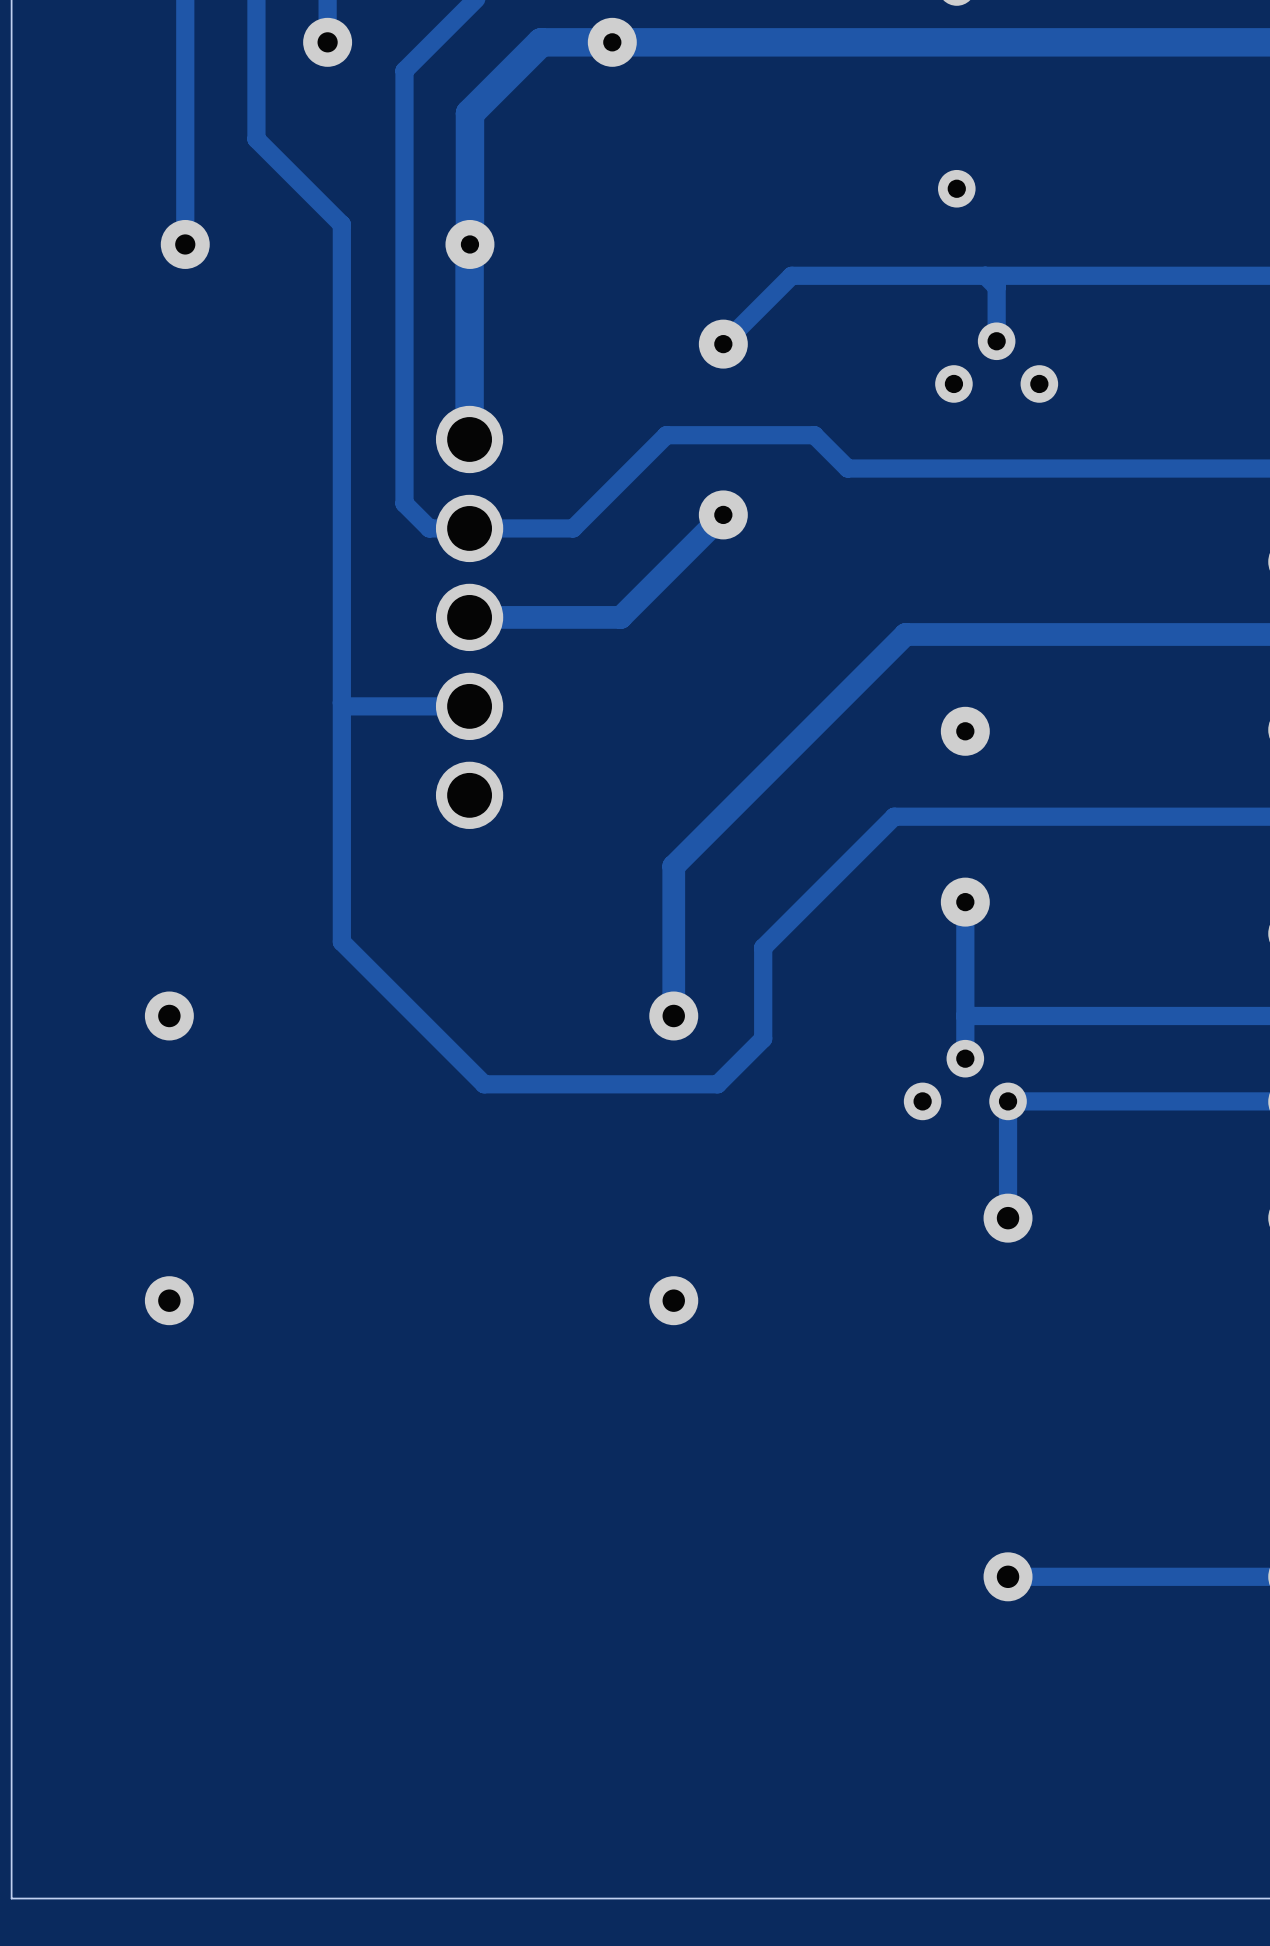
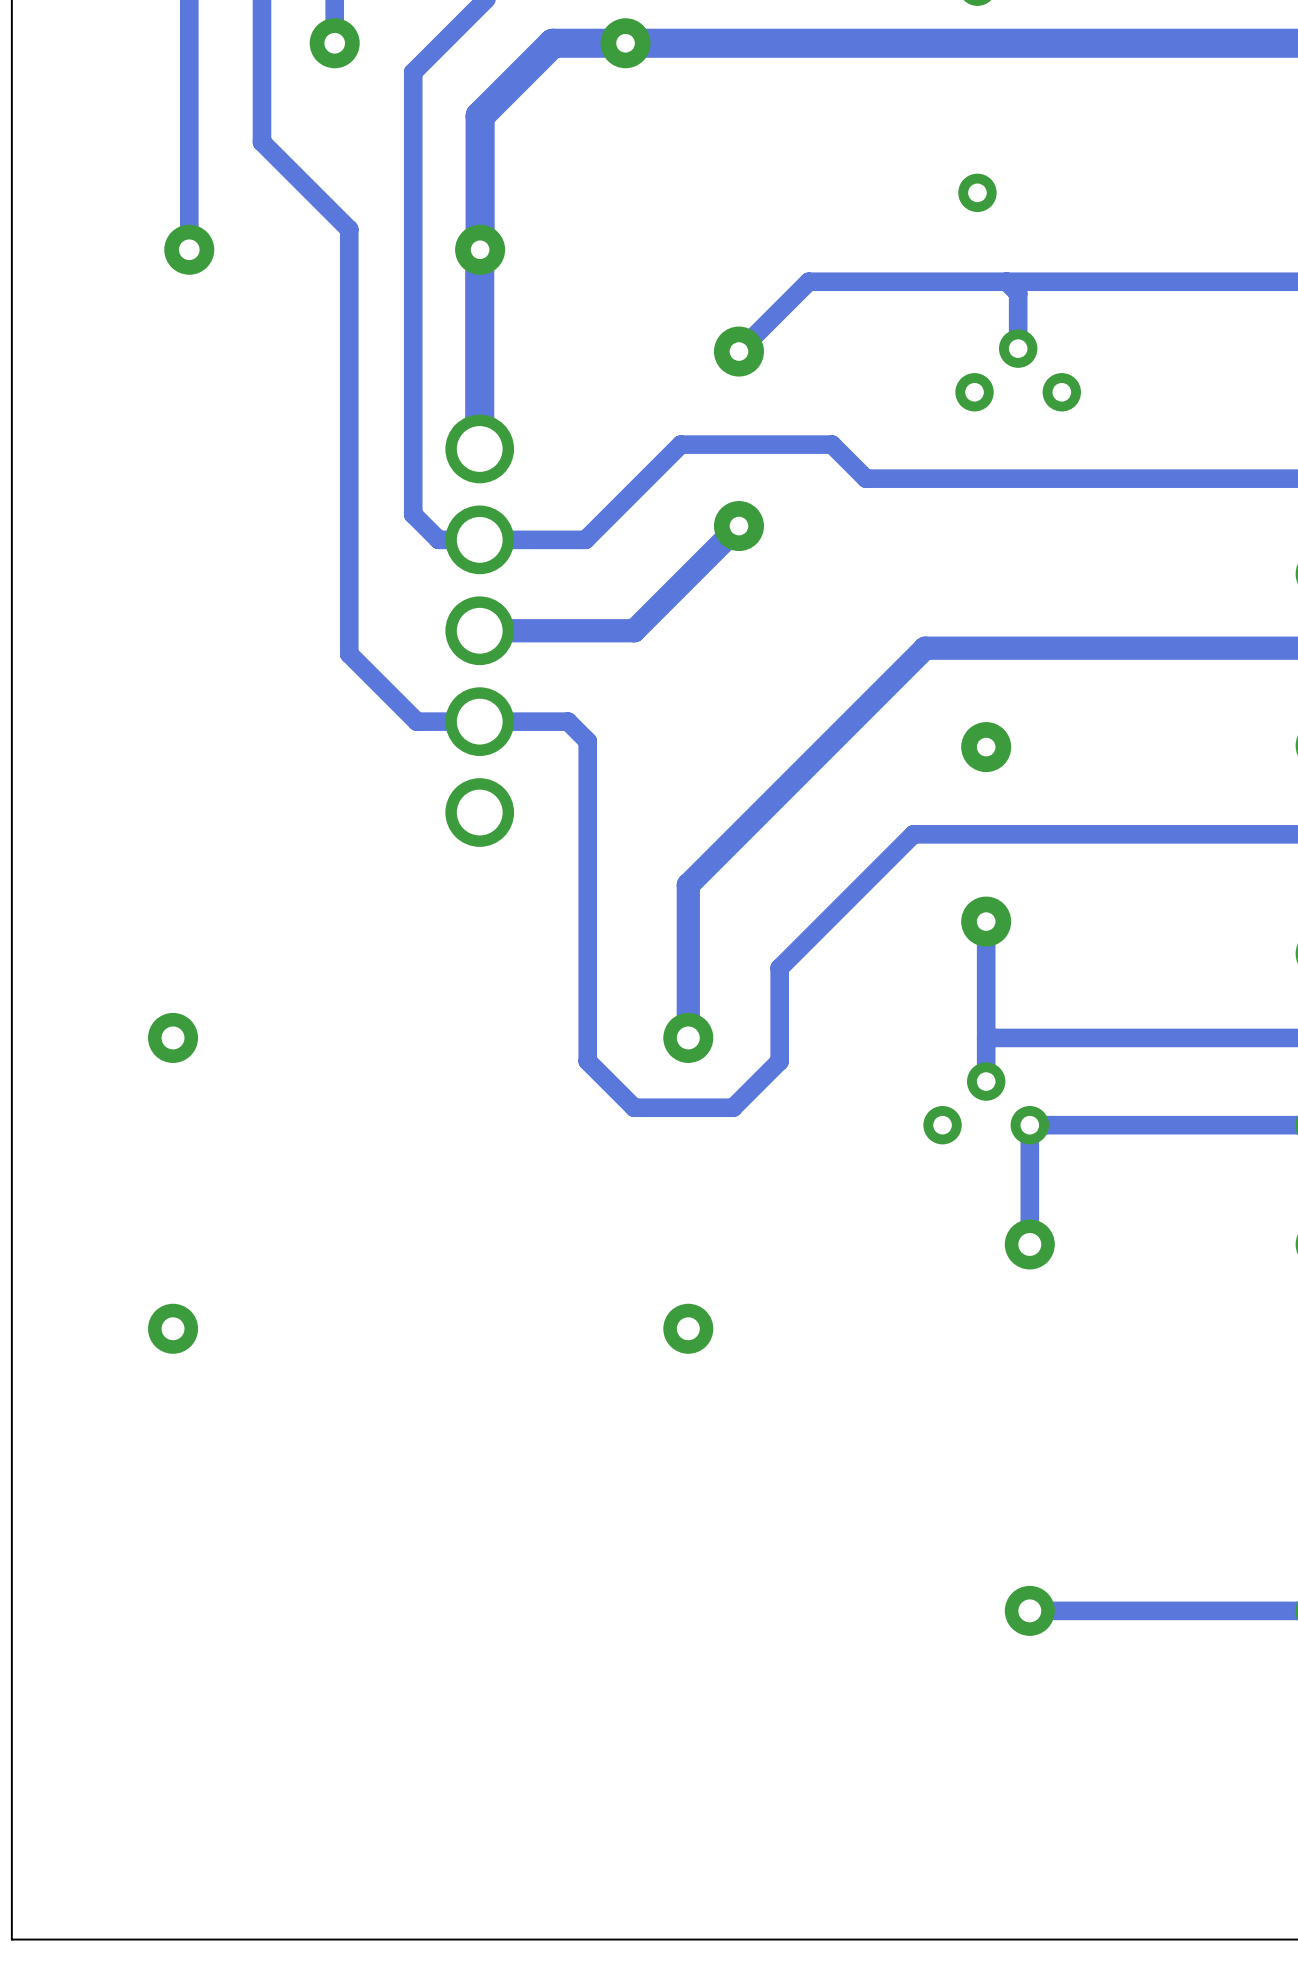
track: (341, 640) (341, 941) (484, 1084) (620, 1084) -> (479, 721) (568, 721) (587, 741) (587, 1061) (634, 1107)
track: (341, 702) (345, 706) (408, 706) -> (349, 654) (416, 721)

